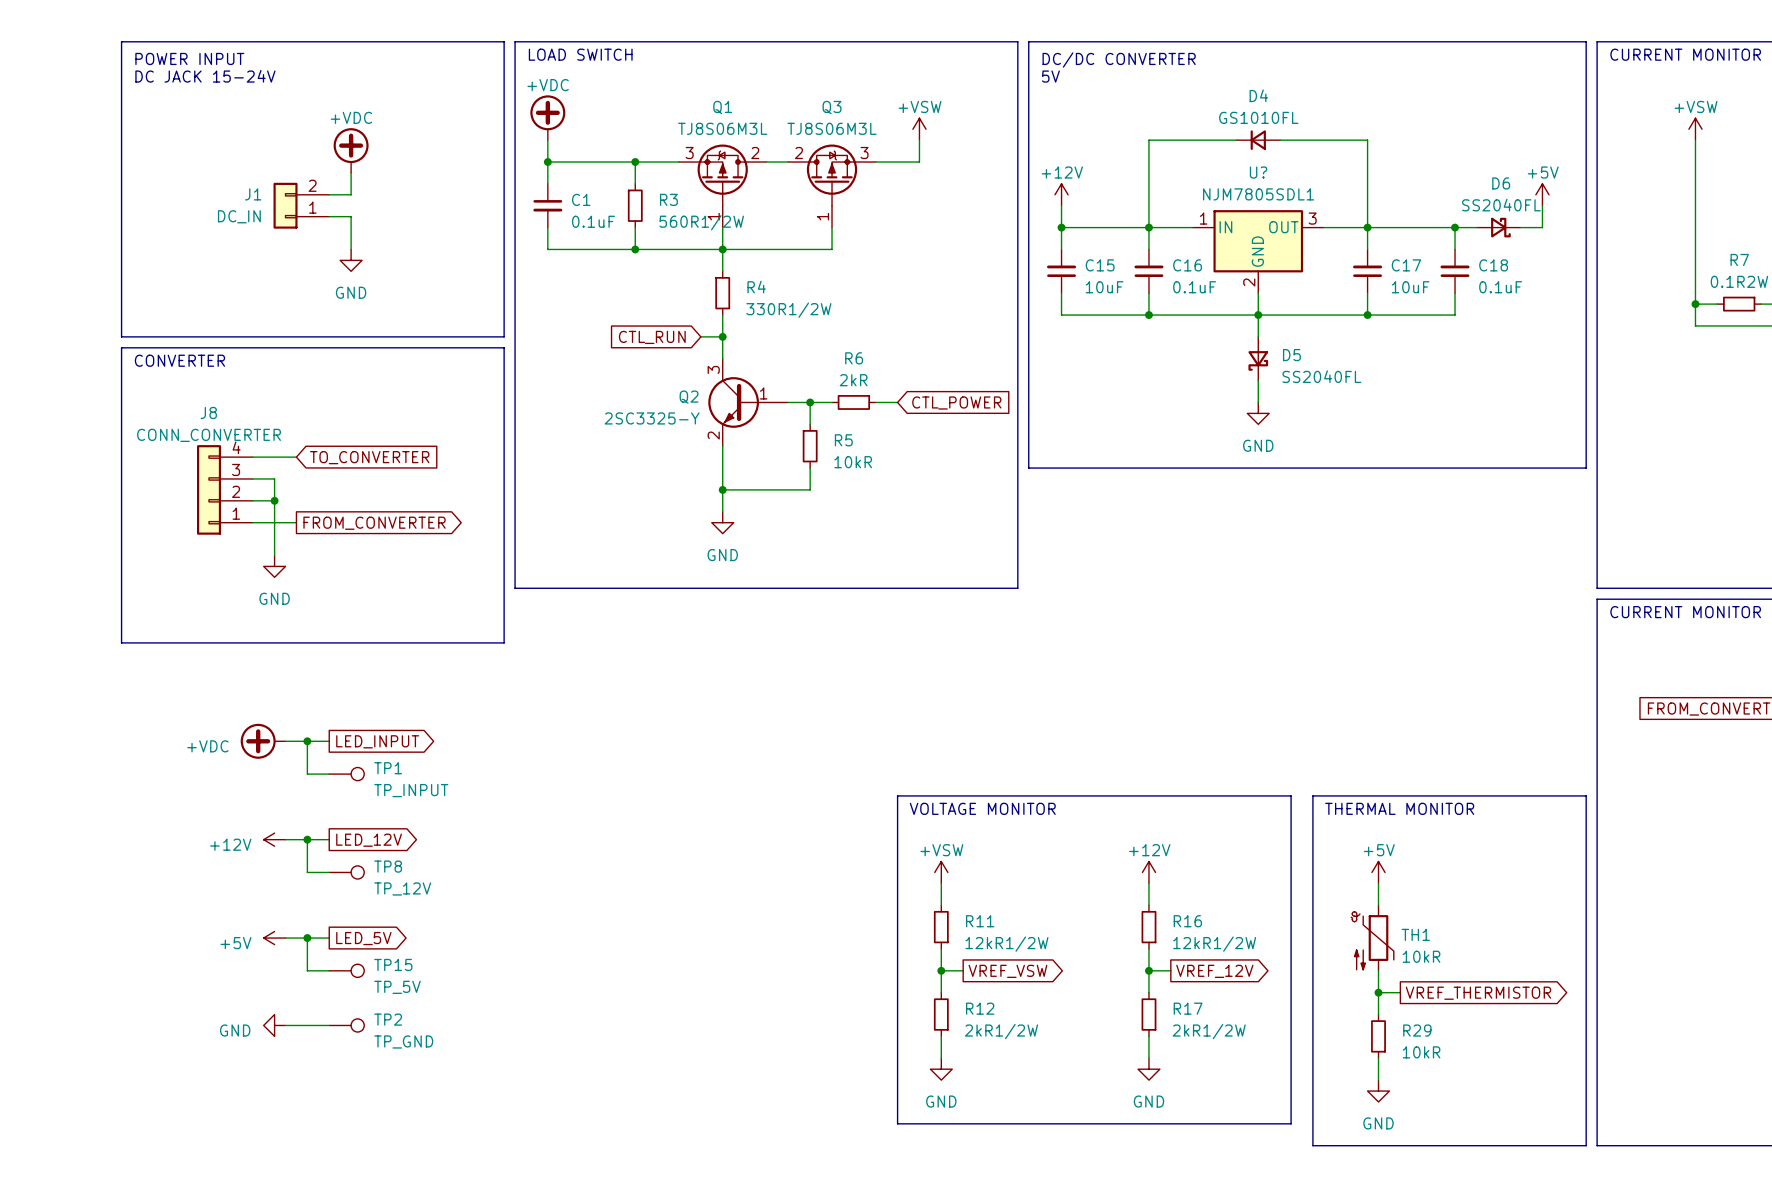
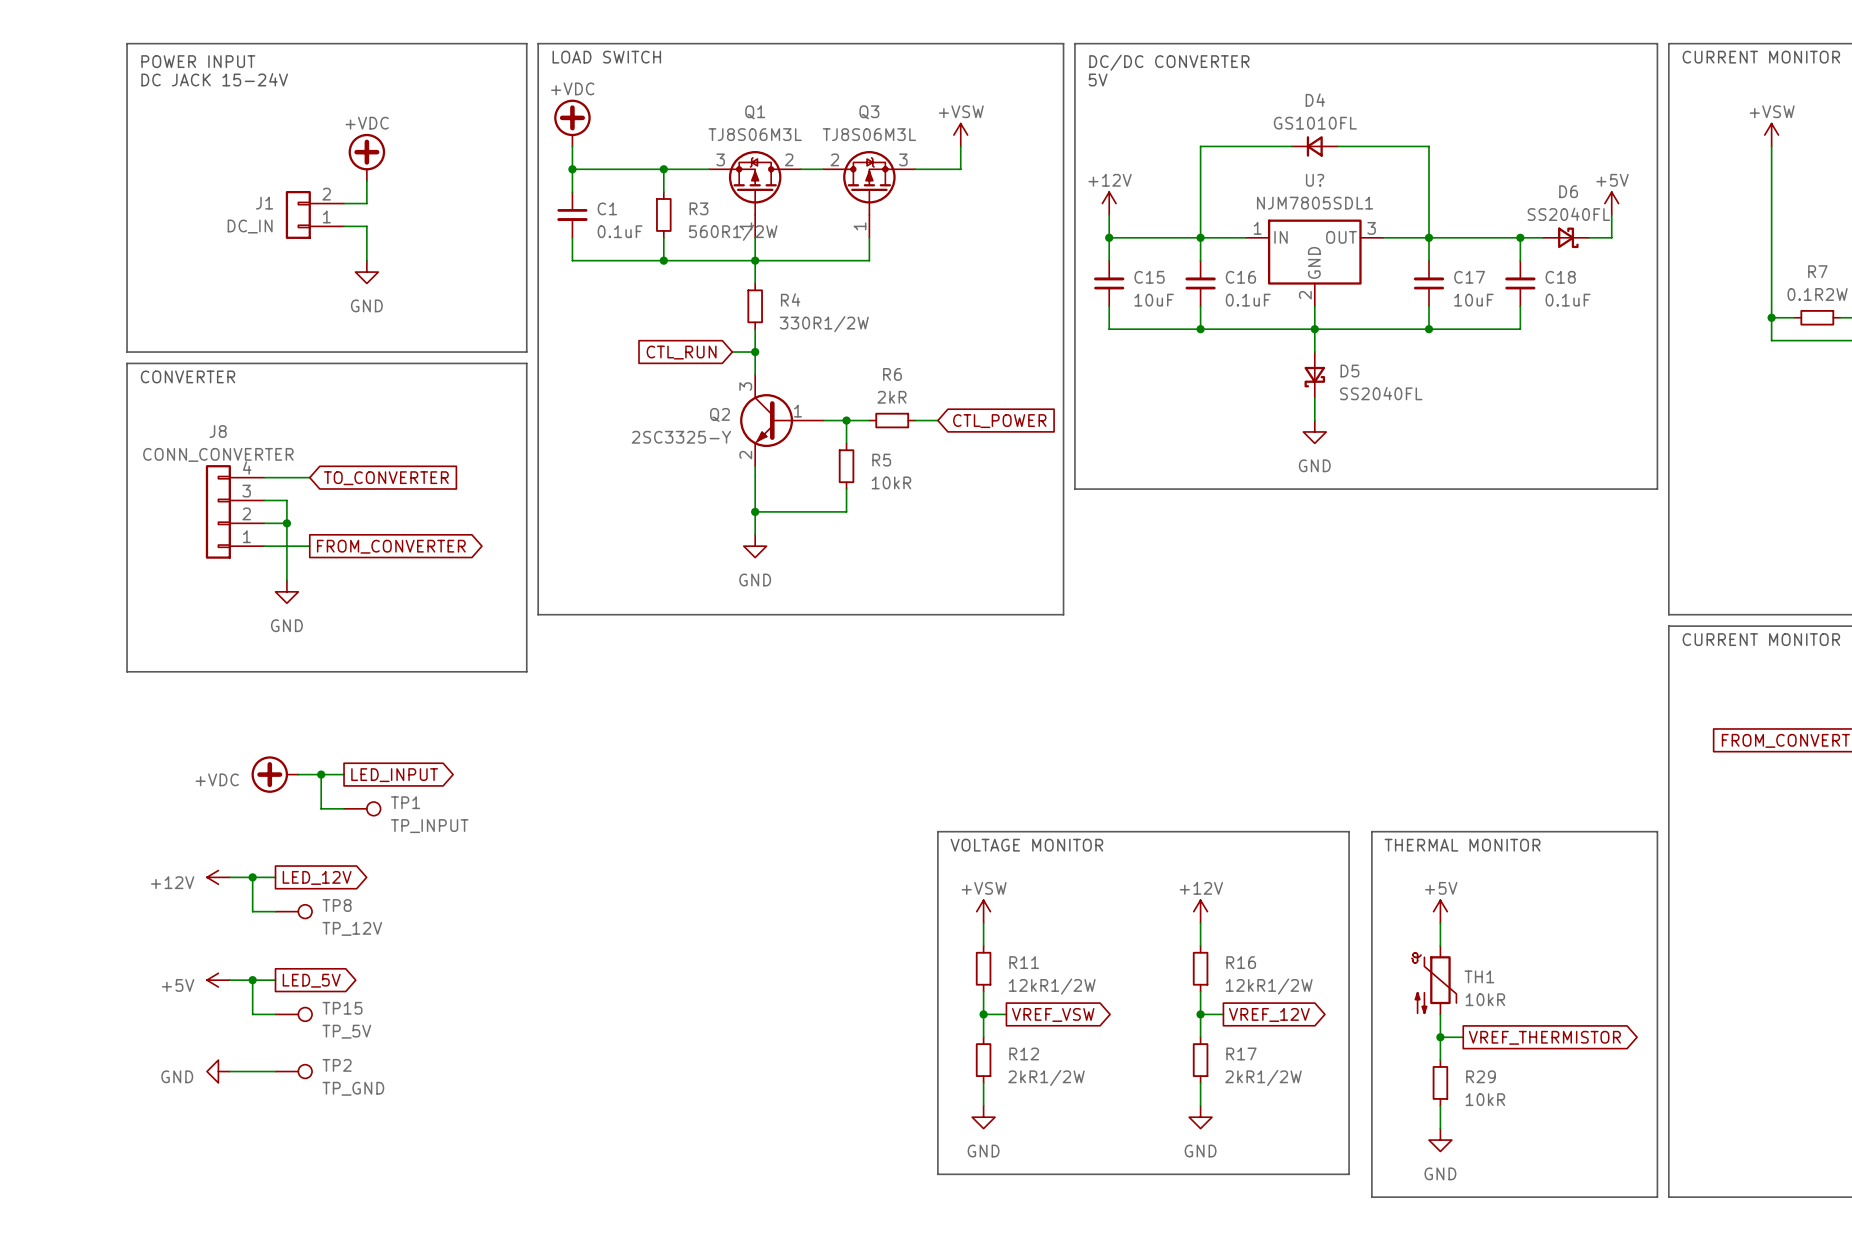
junction: none -> (252, 877)
power symbol position: +12V (274, 839) -> +12V (218, 877)
wire: (285, 839) (329, 839) -> (229, 877) (275, 877)
wire: (307, 839) (307, 872) (329, 872) -> (252, 877) (252, 911) (275, 911)
junction: (307, 839) -> none
global label position: LED_12V (369, 840) -> LED_12V (317, 877)
TP8 position: (346, 872) -> (293, 911)
junction: none -> (252, 980)
power symbol position: +5V (274, 938) -> +5V (218, 980)
wire: (285, 938) (329, 938) -> (229, 980) (275, 980)
wire: (307, 938) (307, 970) (329, 970) -> (252, 980) (252, 1014) (275, 1014)
junction: (307, 938) -> none
global label position: LED_5V (363, 938) -> LED_5V (311, 980)
TP15 position: (346, 970) -> (293, 1014)
power symbol position: GND (274, 1025) -> GND (218, 1071)
wire: (285, 1025) (329, 1025) -> (229, 1071) (275, 1071)
TP2 position: (346, 1025) -> (293, 1071)

